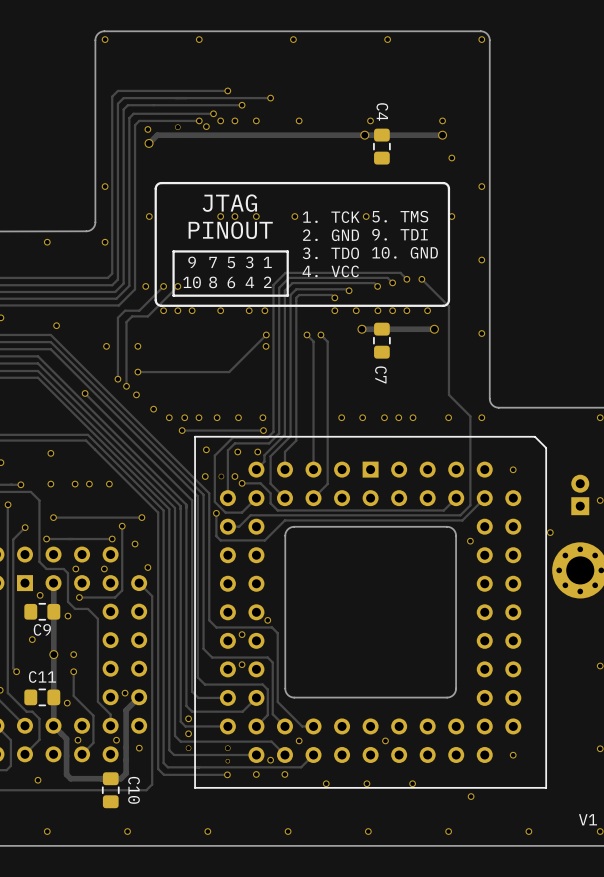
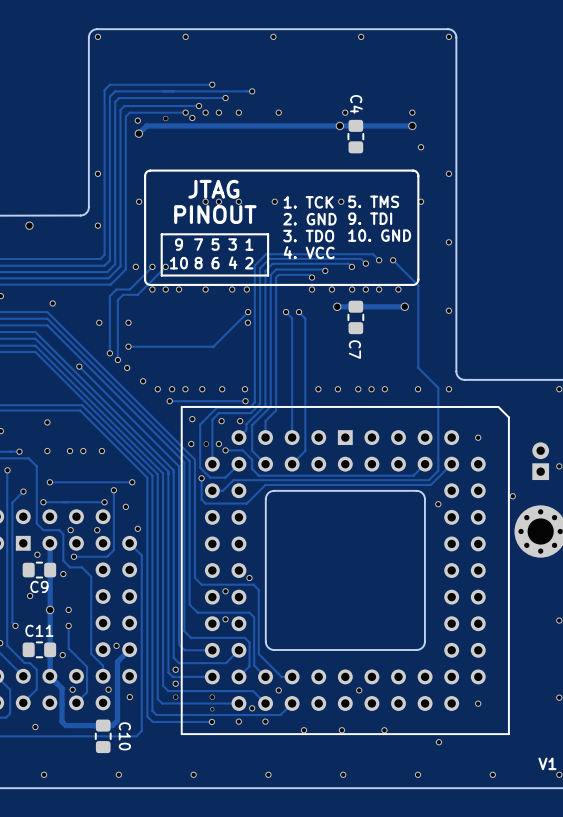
via: none -> (29, 225)
via: (47, 242) -> none

